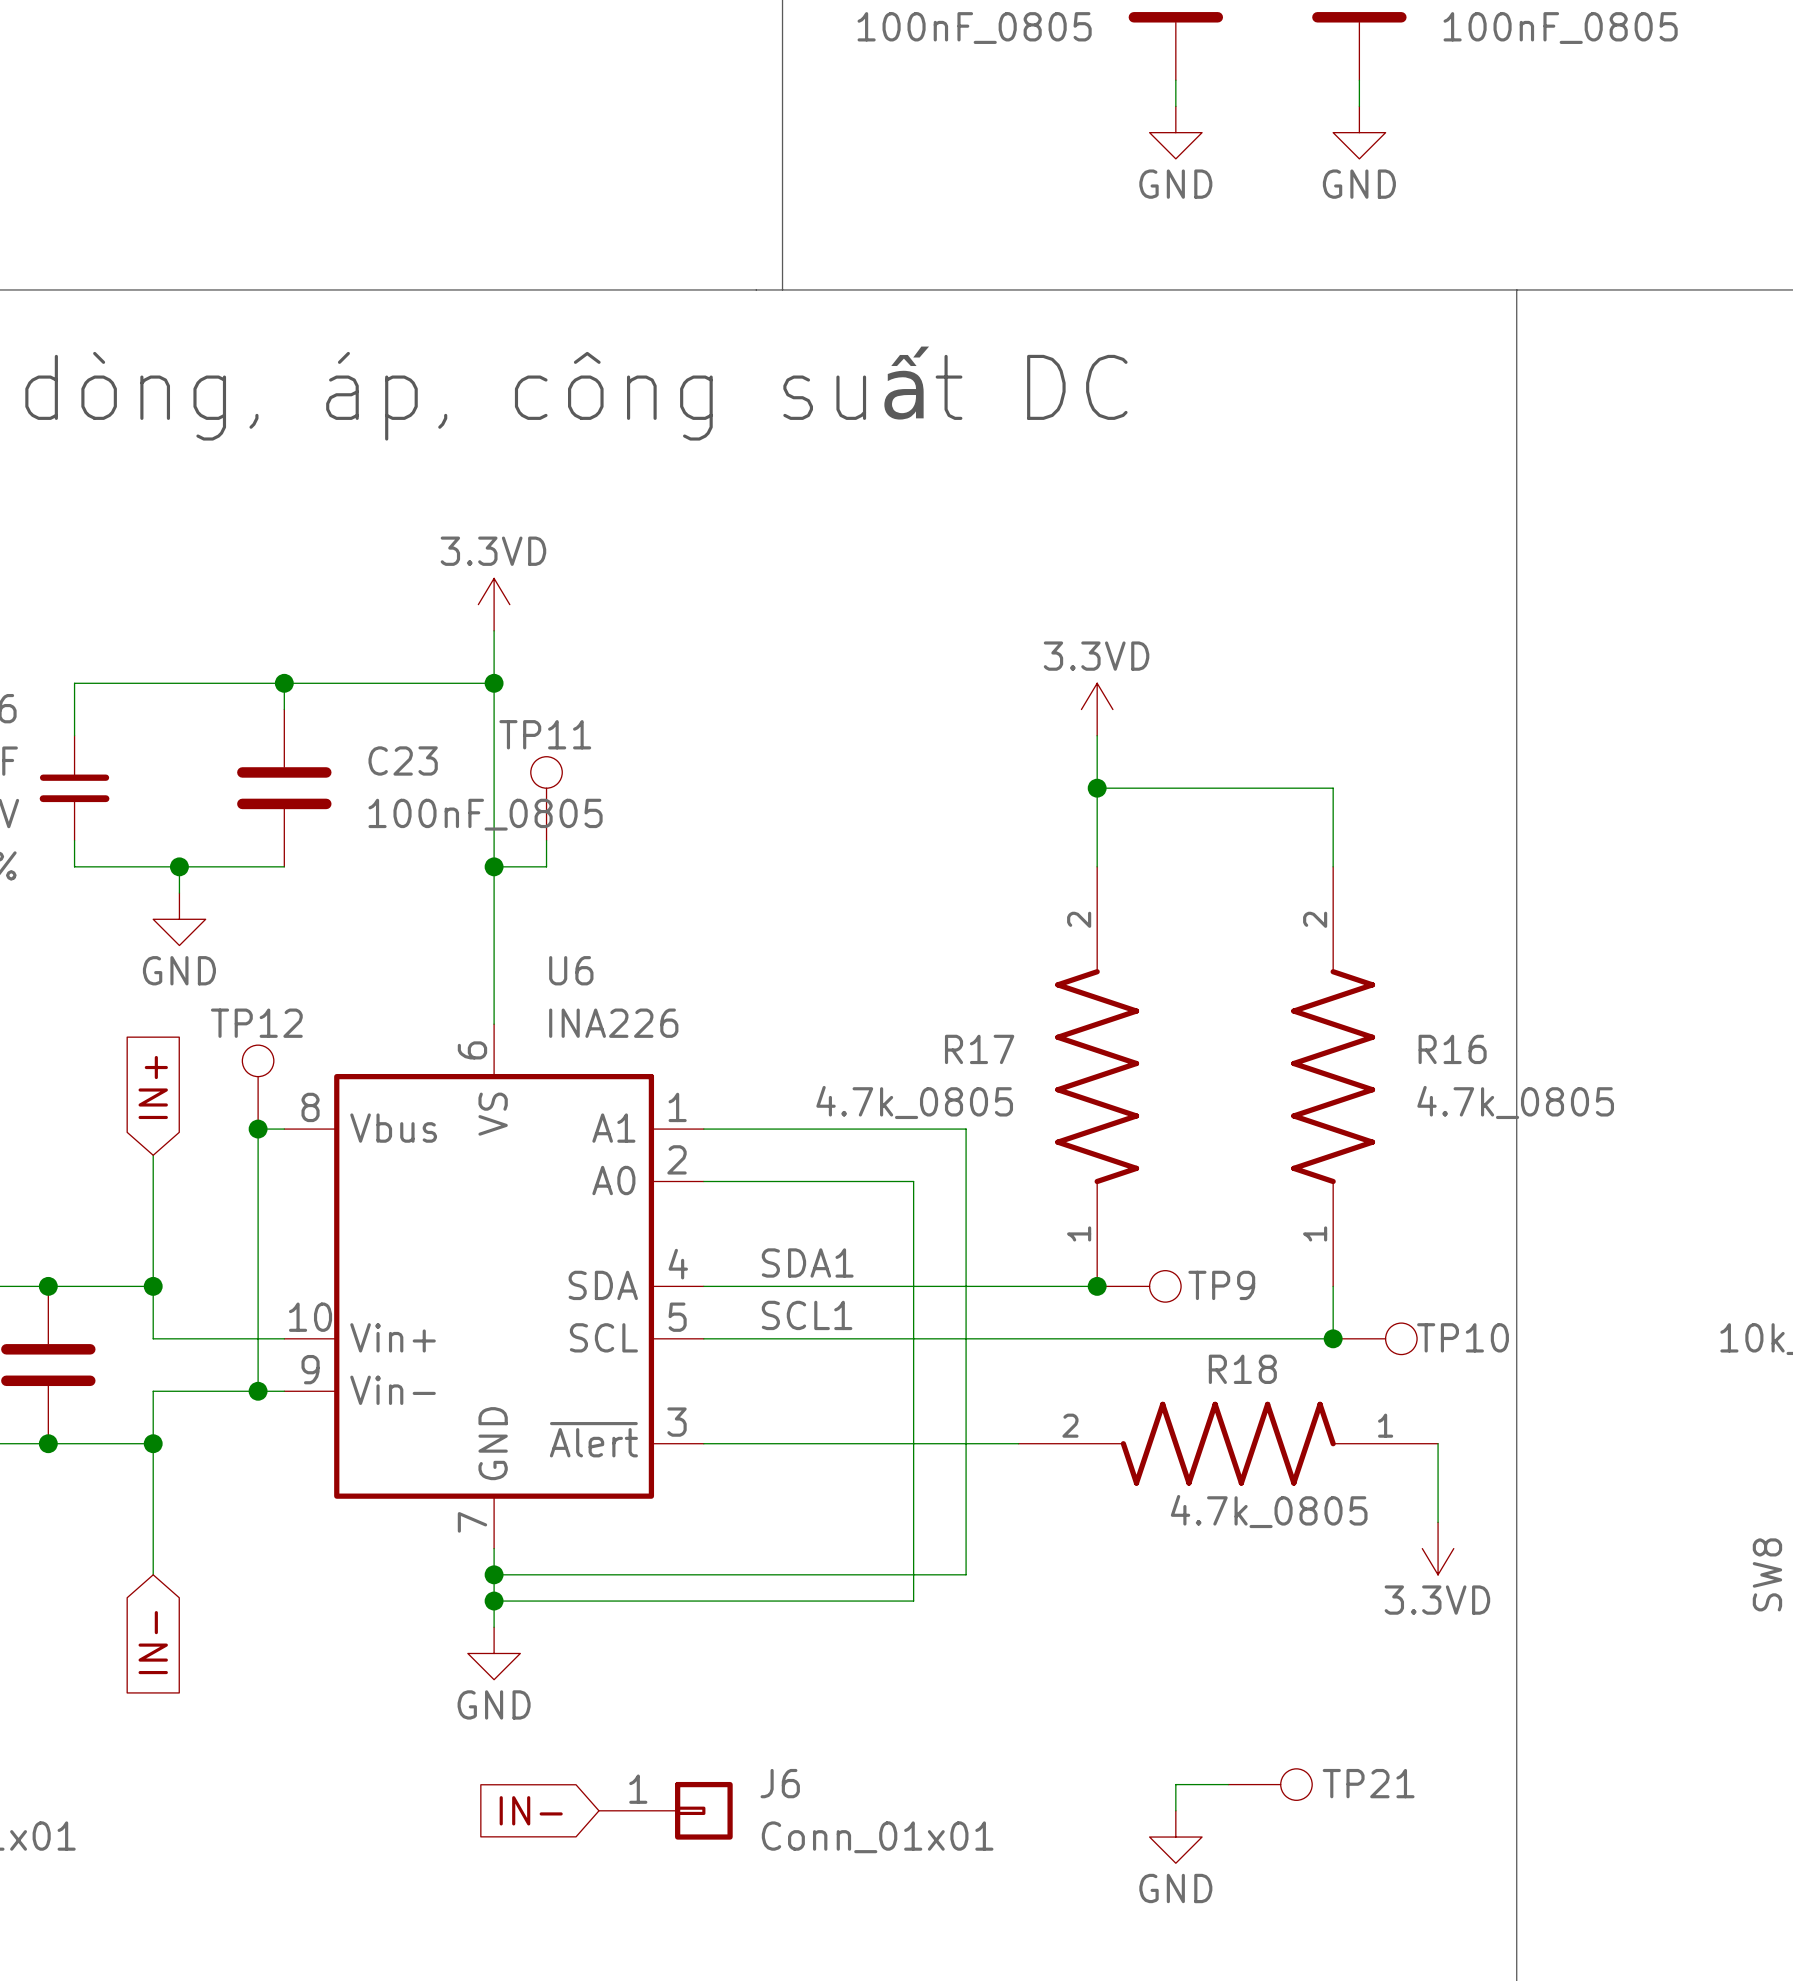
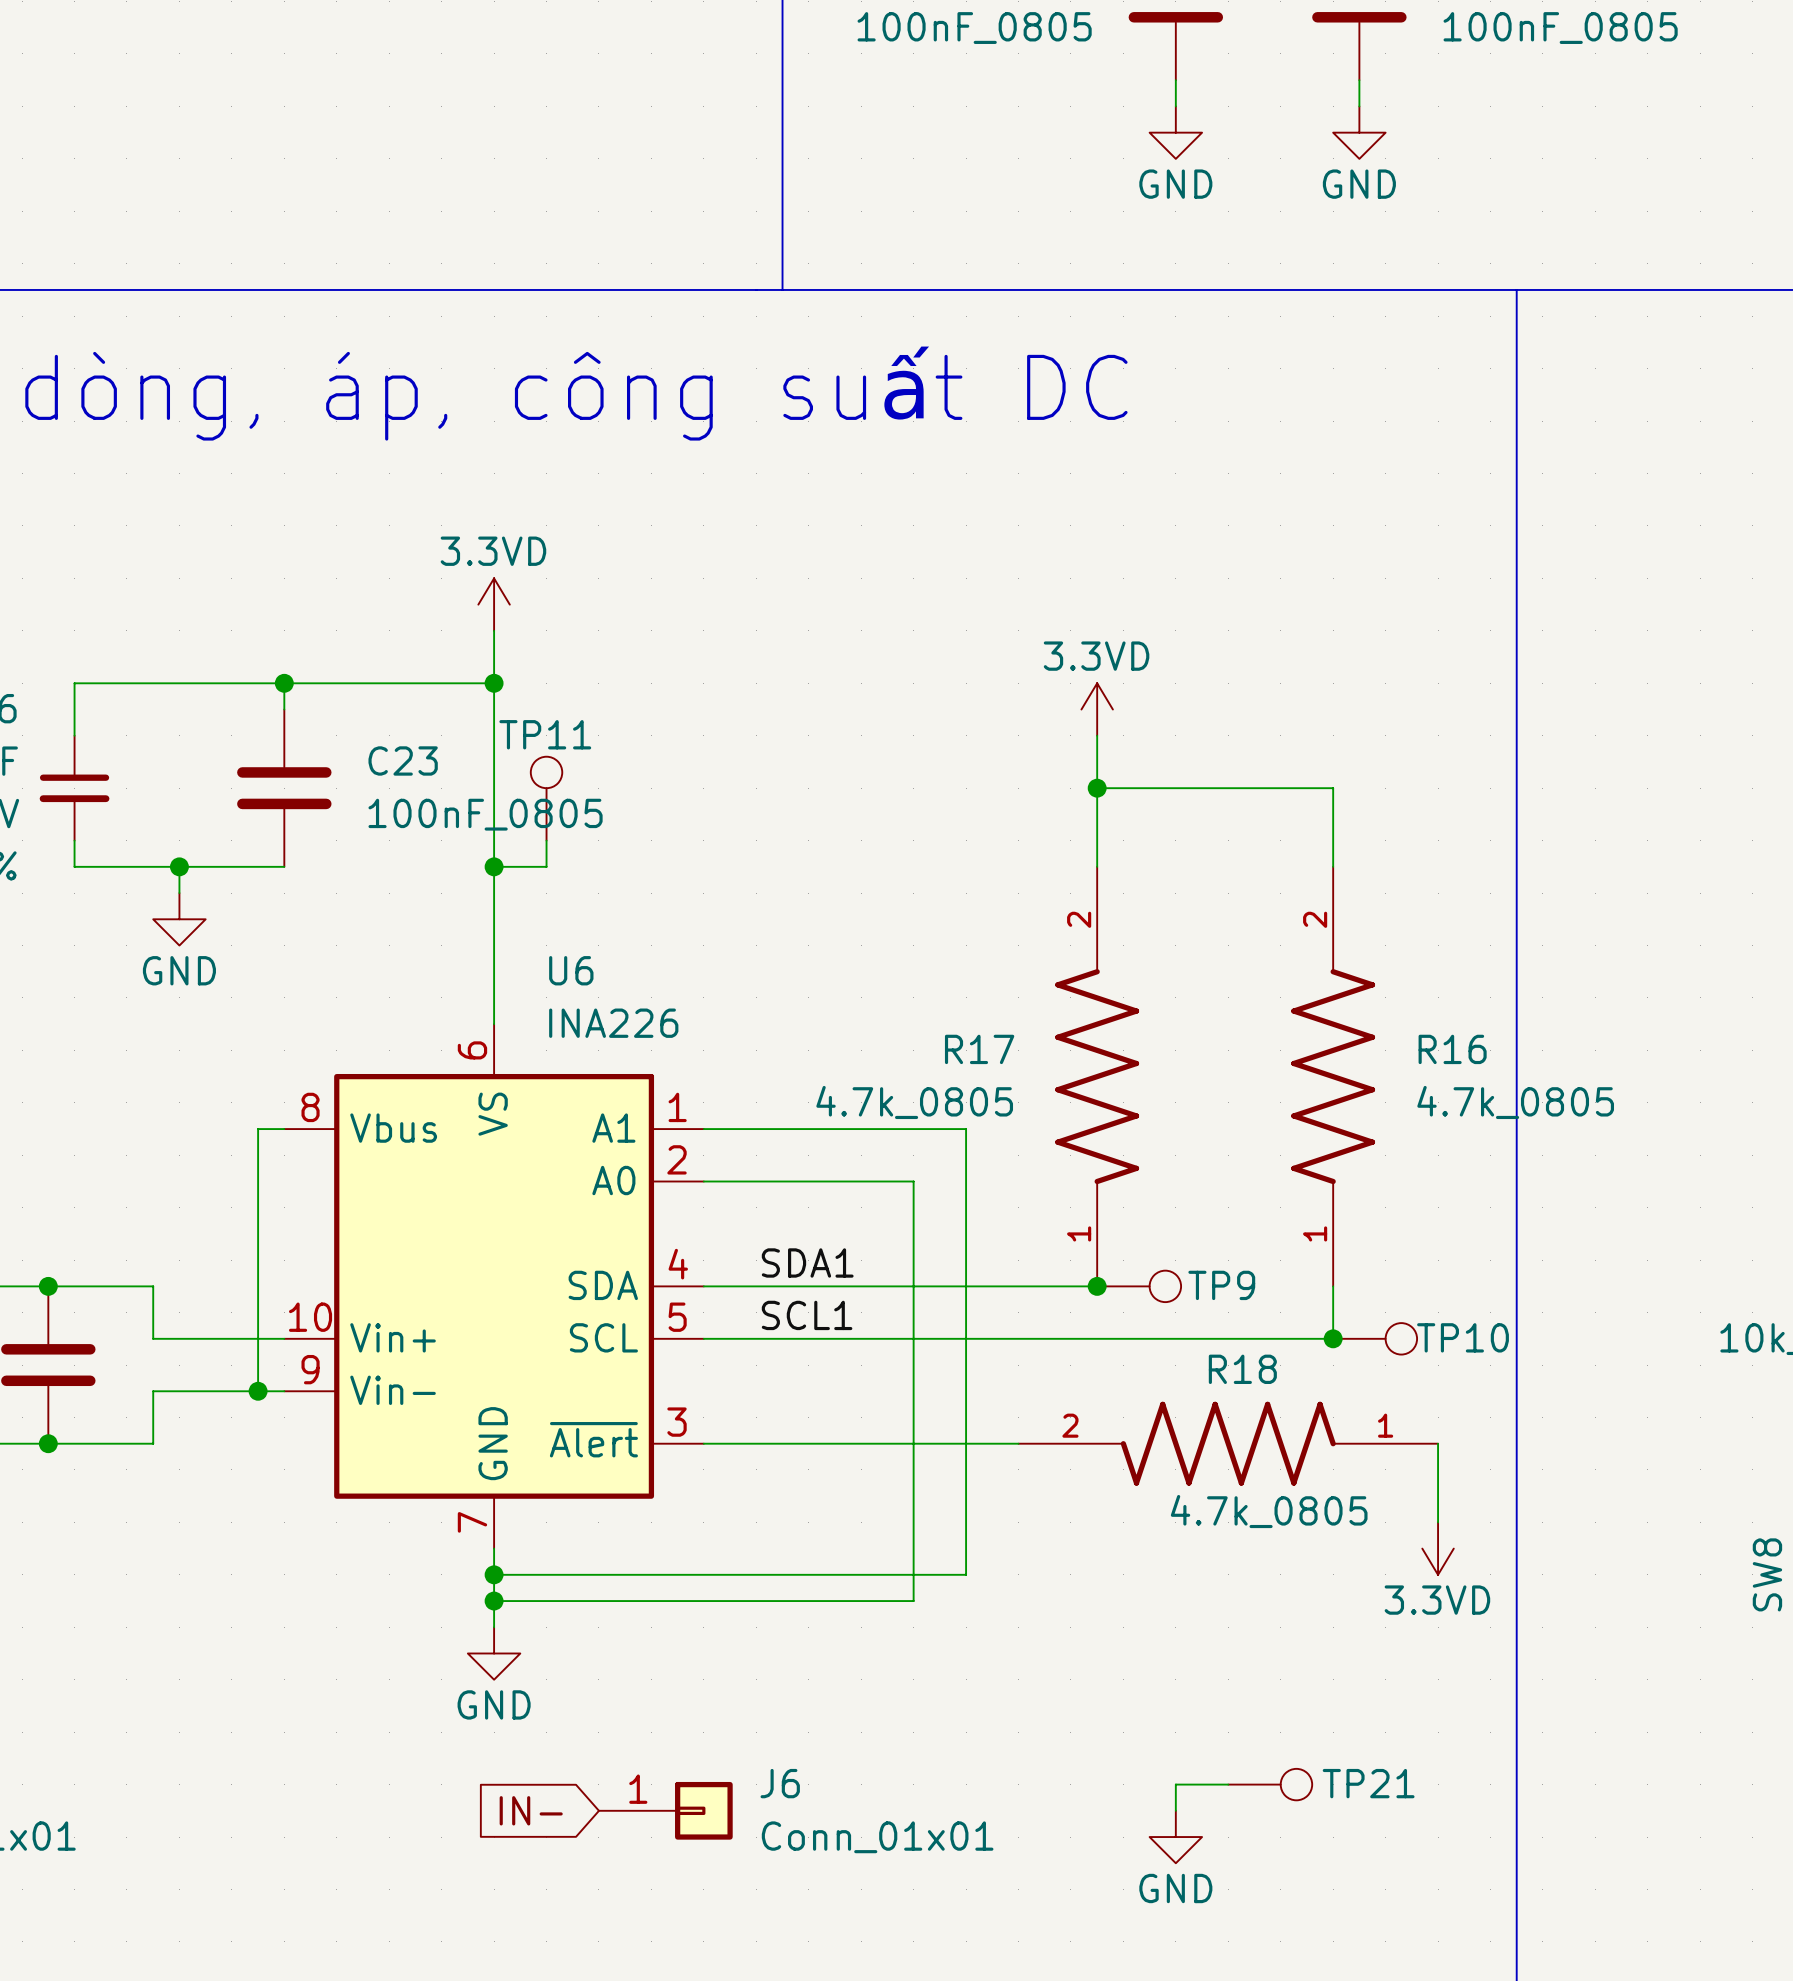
global label: IN+ (153, 1087) -> none
TP12: (258, 1087) -> none
junction: (258, 1129) -> none
wire: (153, 1155) (153, 1286) -> none
junction: (153, 1286) -> none
wire: (153, 1443) (153, 1574) -> none
junction: (153, 1443) -> none
global label: IN- (153, 1642) -> none

